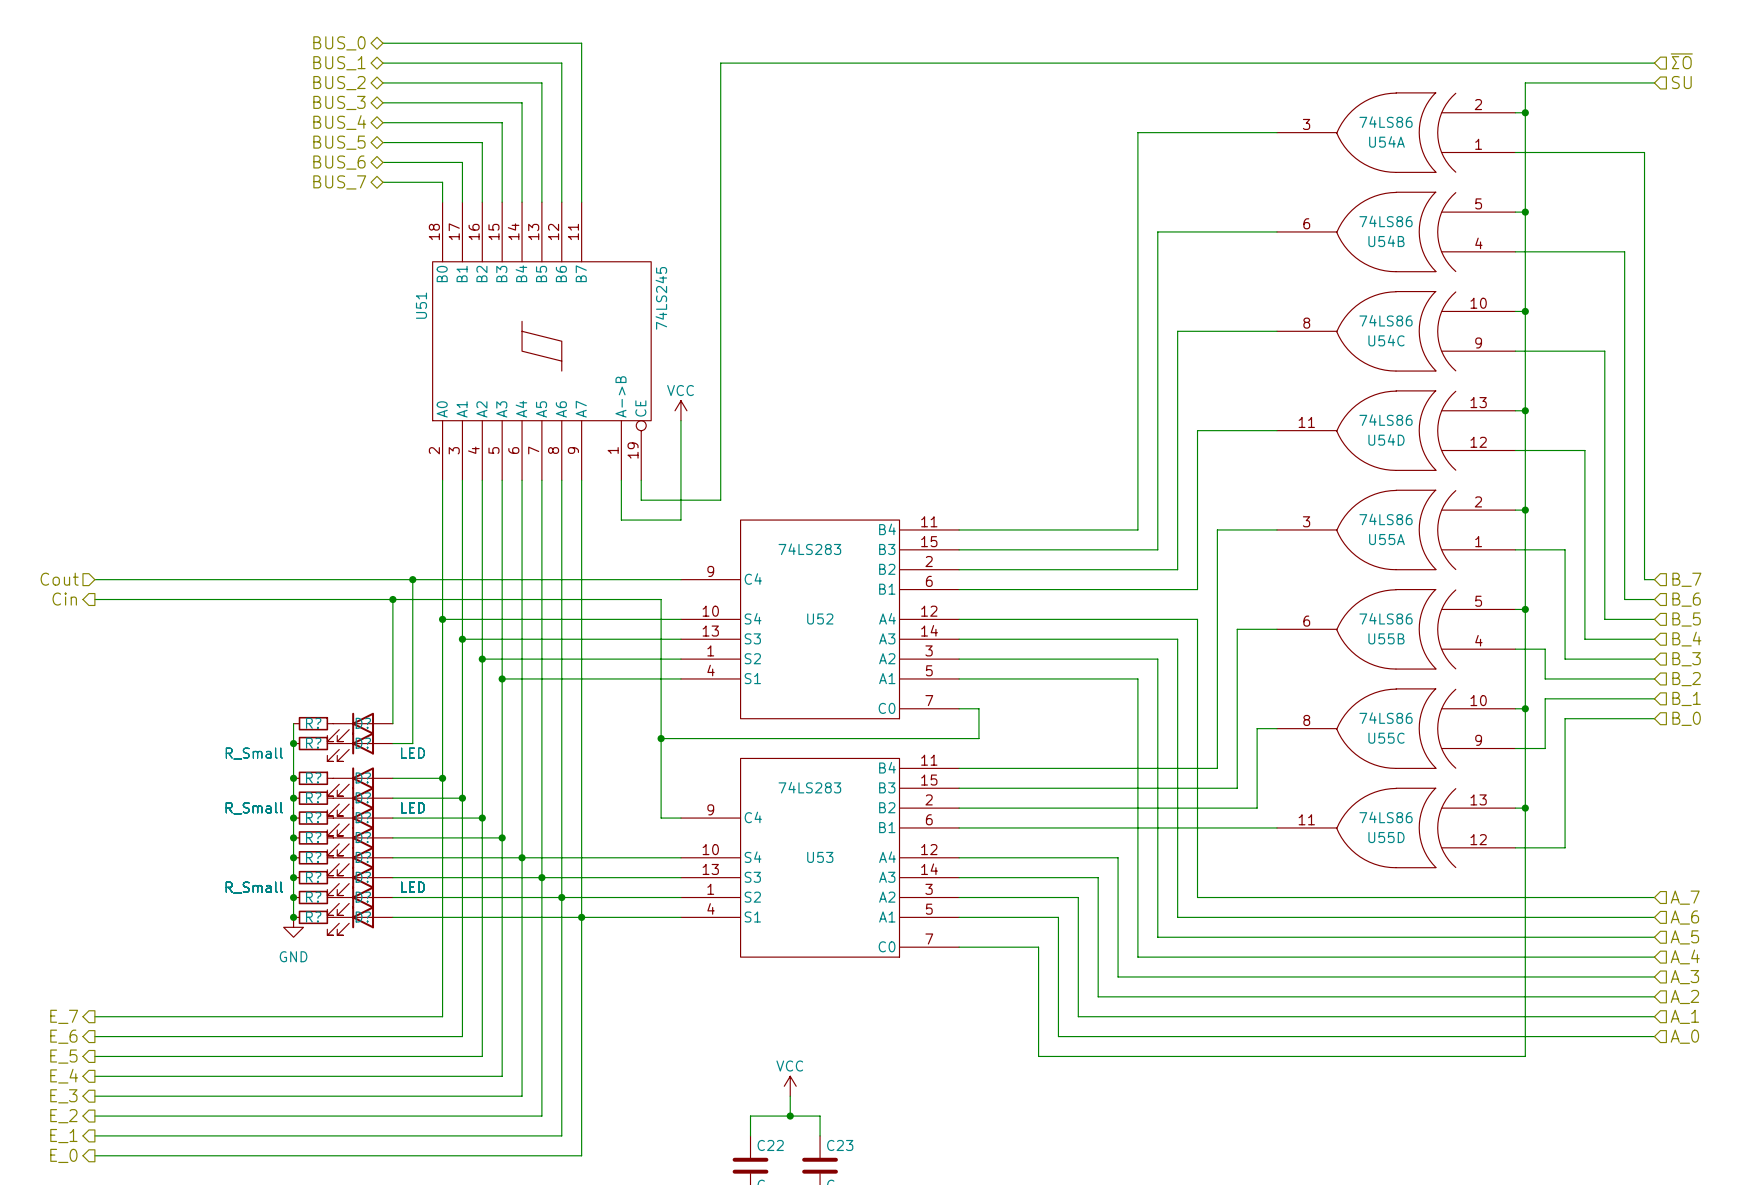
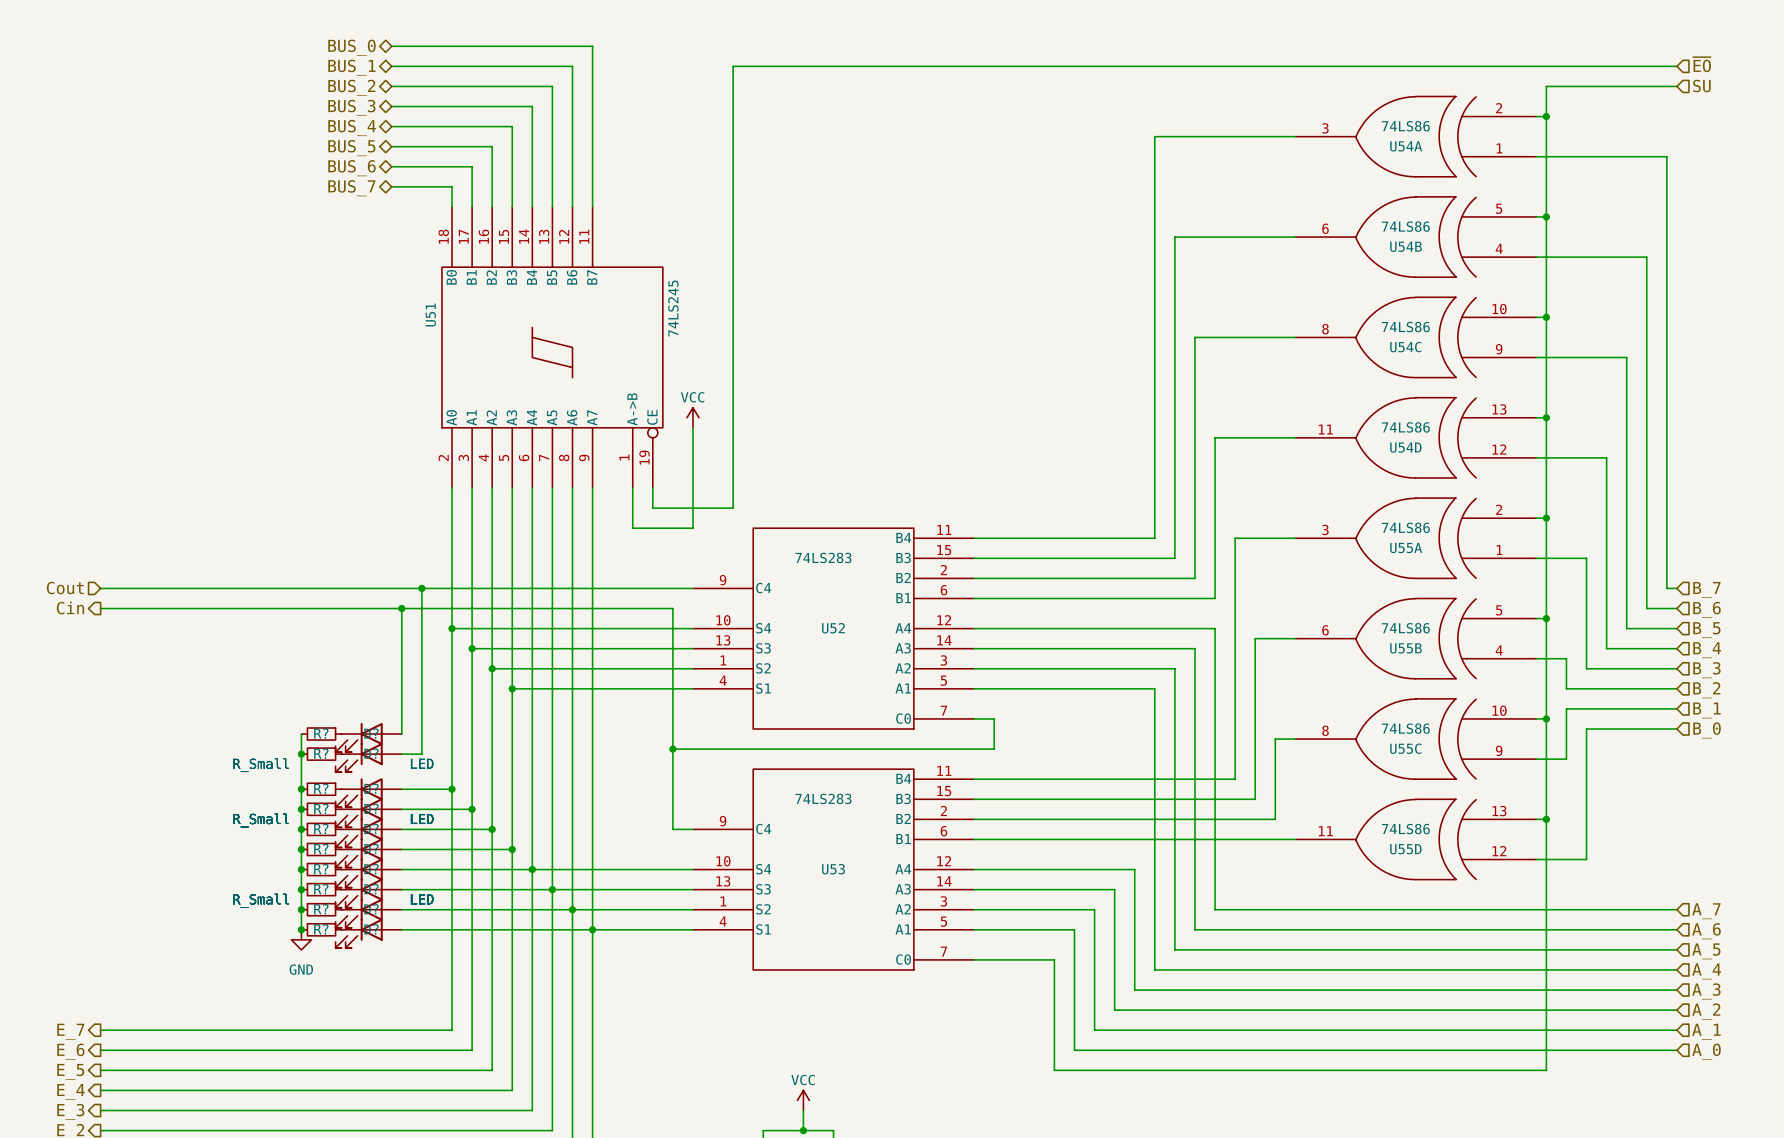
hierarchical label: ~{ΣO} (1681, 61) -> ~{EO} (1702, 64)

